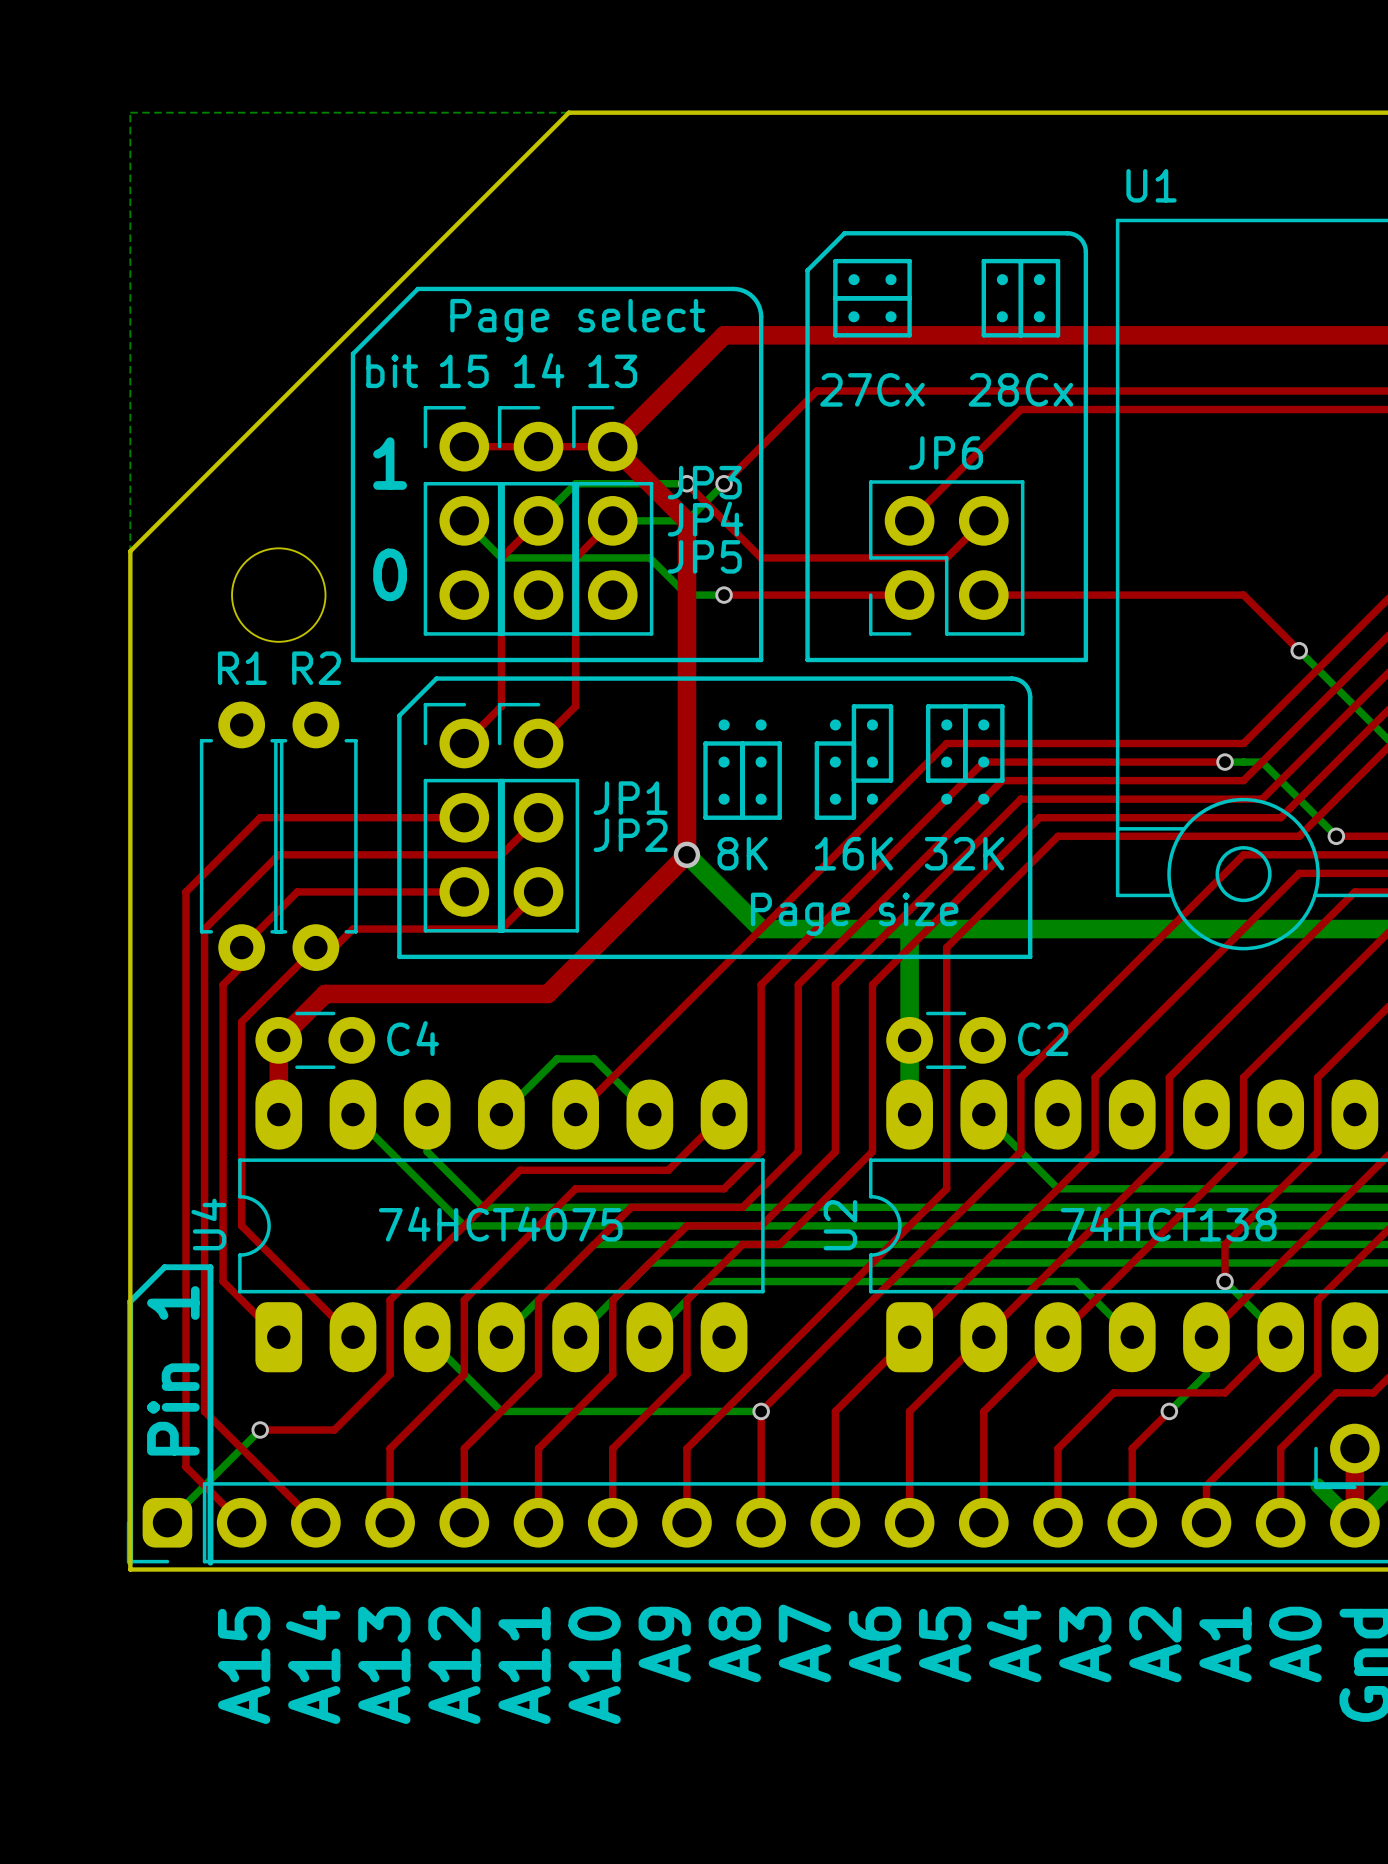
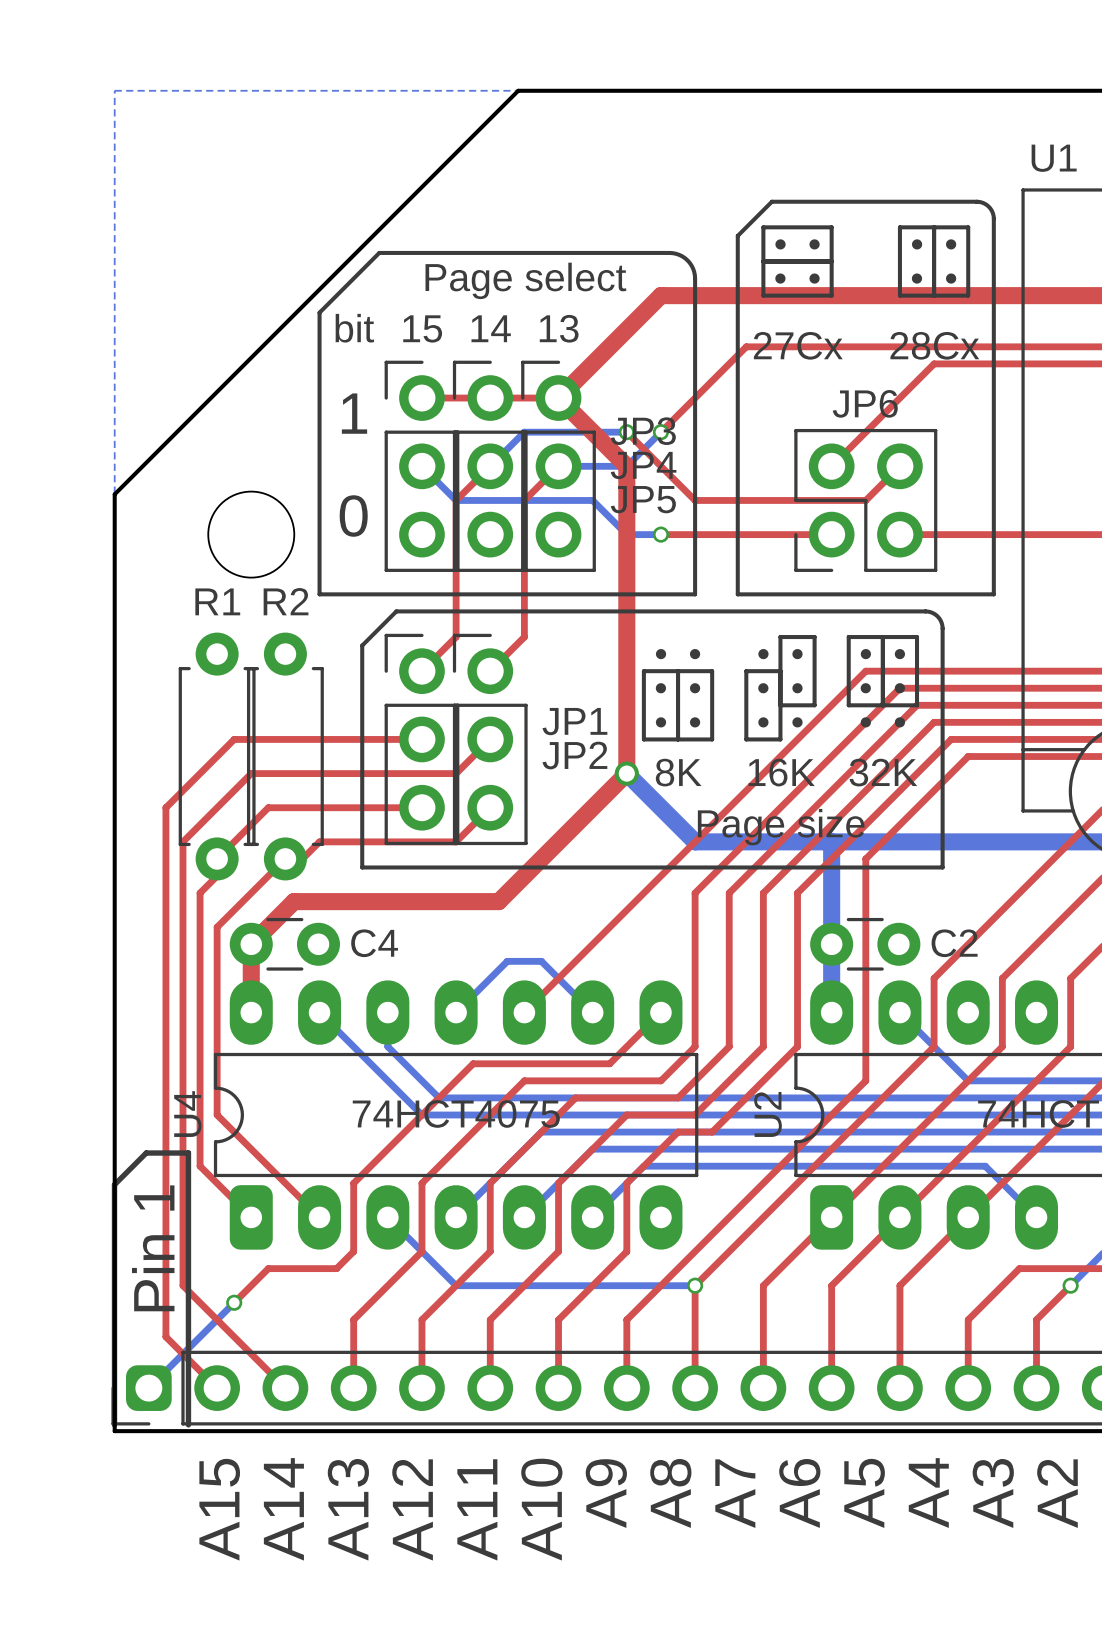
top track: (371, 1392) (334, 1429) (260, 1429) -> (336, 1268) (268, 1268) (234, 1302)

